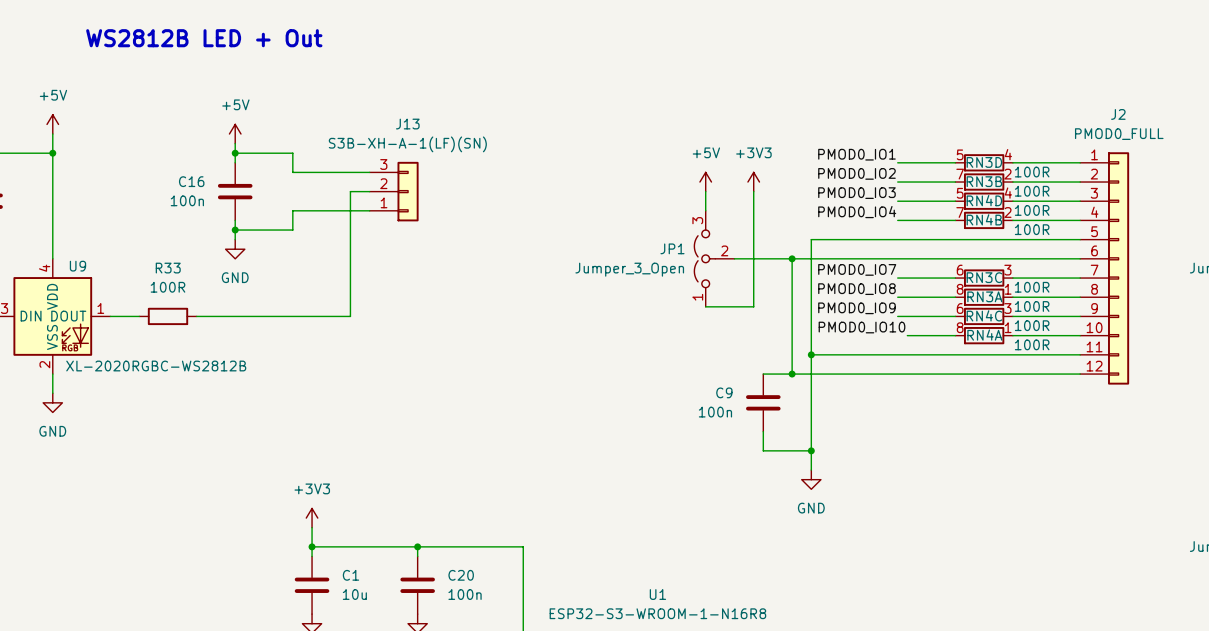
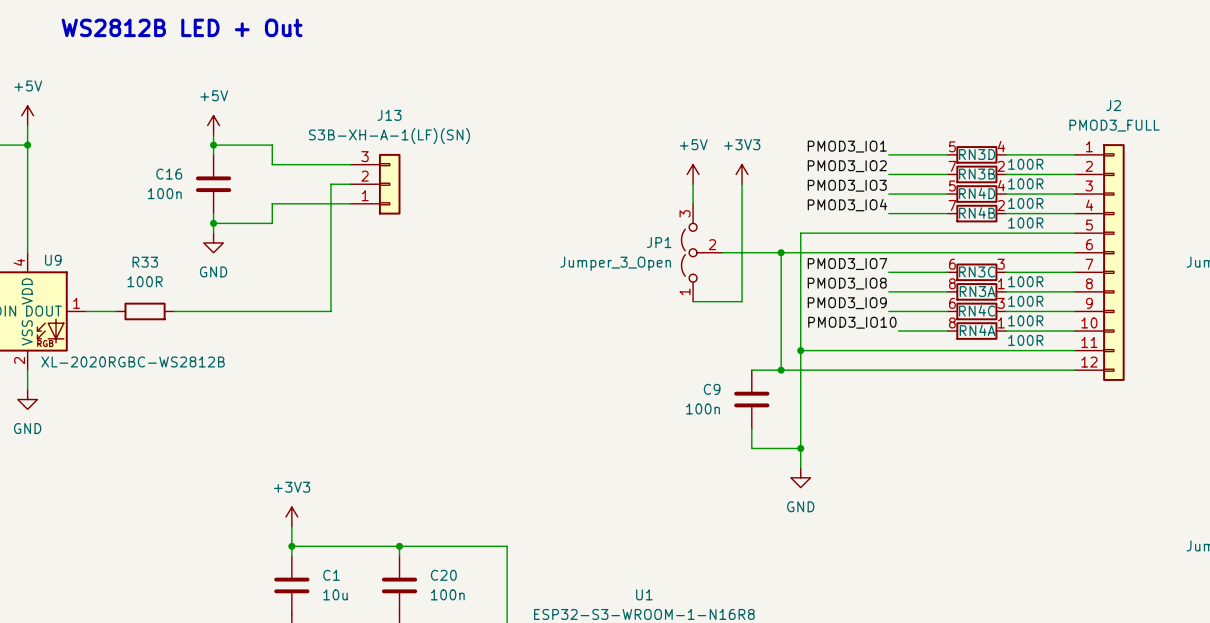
J2 value: PMOD0_FULL (1119, 134) -> PMOD3_FULL (1114, 125)
label: PMOD0_IO1 (856, 154) -> PMOD3_IO1 (847, 146)
label: PMOD0_IO2 (856, 173) -> PMOD3_IO2 (847, 166)
label: PMOD0_IO3 (856, 193) -> PMOD3_IO3 (847, 185)
label: PMOD0_IO4 (857, 212) -> PMOD3_IO4 (847, 205)
label: PMOD0_IO7 (857, 269) -> PMOD3_IO7 (847, 264)
label: PMOD0_IO8 (856, 289) -> PMOD3_IO8 (847, 283)
label: PMOD0_IO9 (856, 308) -> PMOD3_IO9 (847, 303)
label: PMOD0_IO10 (862, 327) -> PMOD3_IO10 (852, 322)

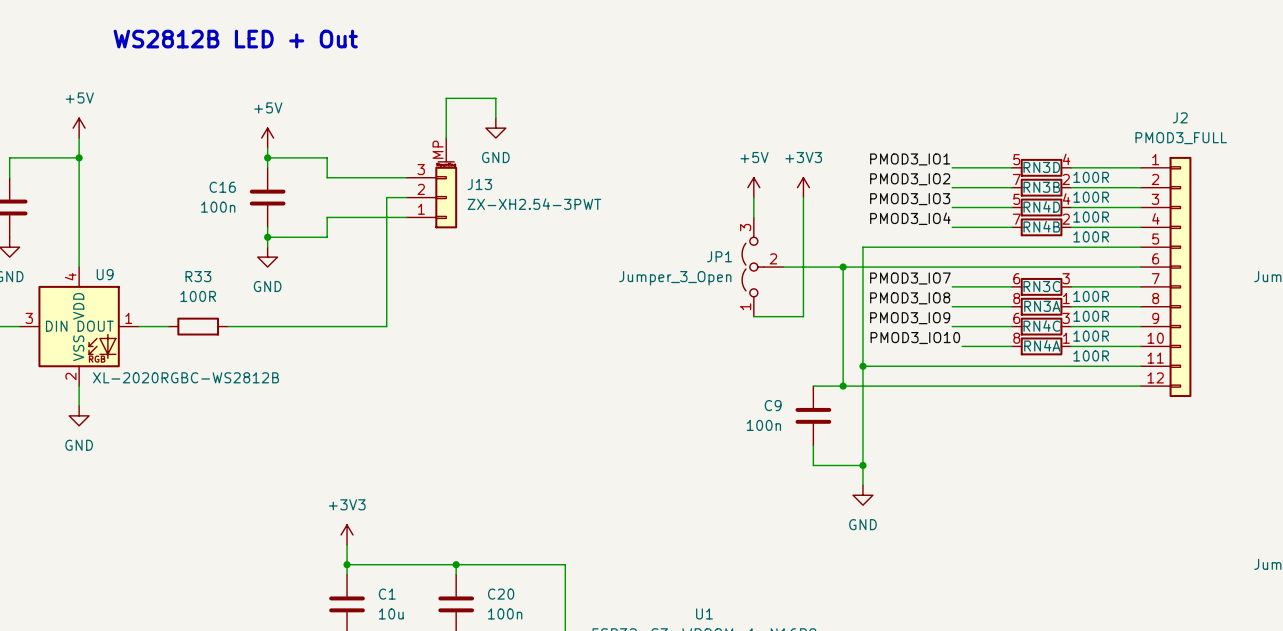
wire: none -> (495, 118) (495, 98) (446, 98) (446, 138)
J13 name position: J13 (389, 115) -> J13 (479, 184)
power symbol: none -> GND (495, 128)
J13 value: S3B-XH-A-1(LF)(SN) (389, 136) -> ZX-XH2.54-3PWT (534, 204)
J13 symbol: [350, 153, 401, 215] -> [406, 138, 458, 229]

